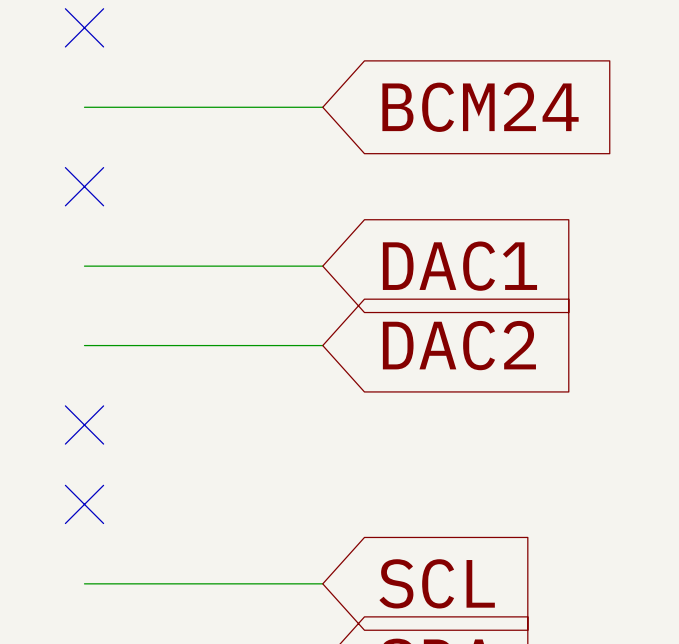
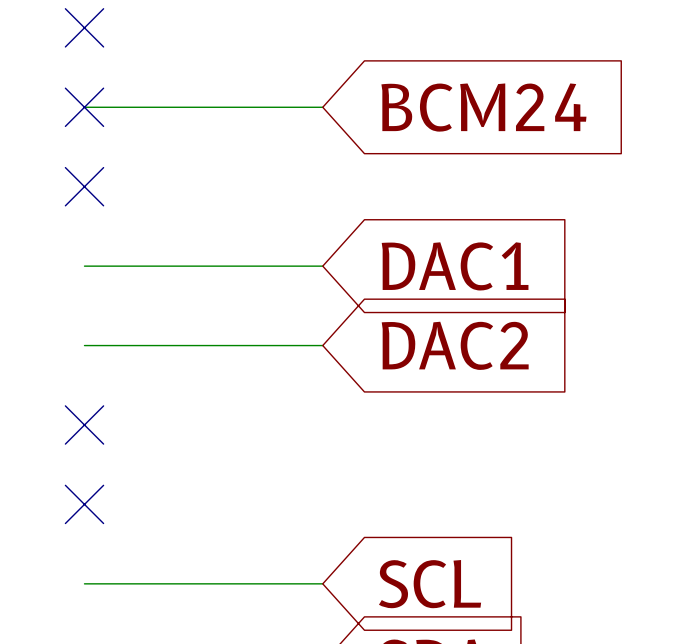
no-connect mark: none -> (84, 107)

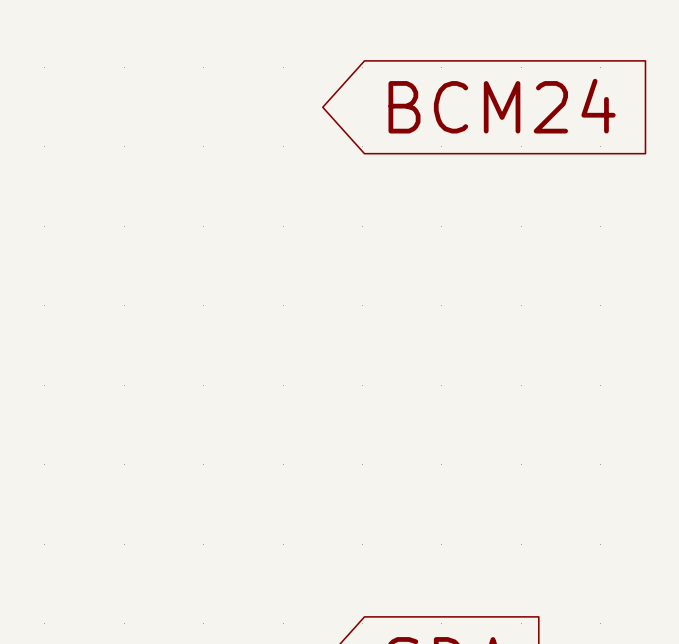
no-connect mark: (84, 27) -> none
wire: (84, 107) (322, 107) -> none
no-connect mark: (84, 107) -> none
no-connect mark: (84, 186) -> none
wire: (84, 266) (322, 266) -> none
global label: DAC1 (455, 266) -> none
wire: (84, 345) (322, 345) -> none
global label: DAC2 (455, 345) -> none
no-connect mark: (84, 424) -> none
no-connect mark: (84, 504) -> none
wire: (84, 583) (322, 583) -> none
global label: SCL (430, 584) -> none

